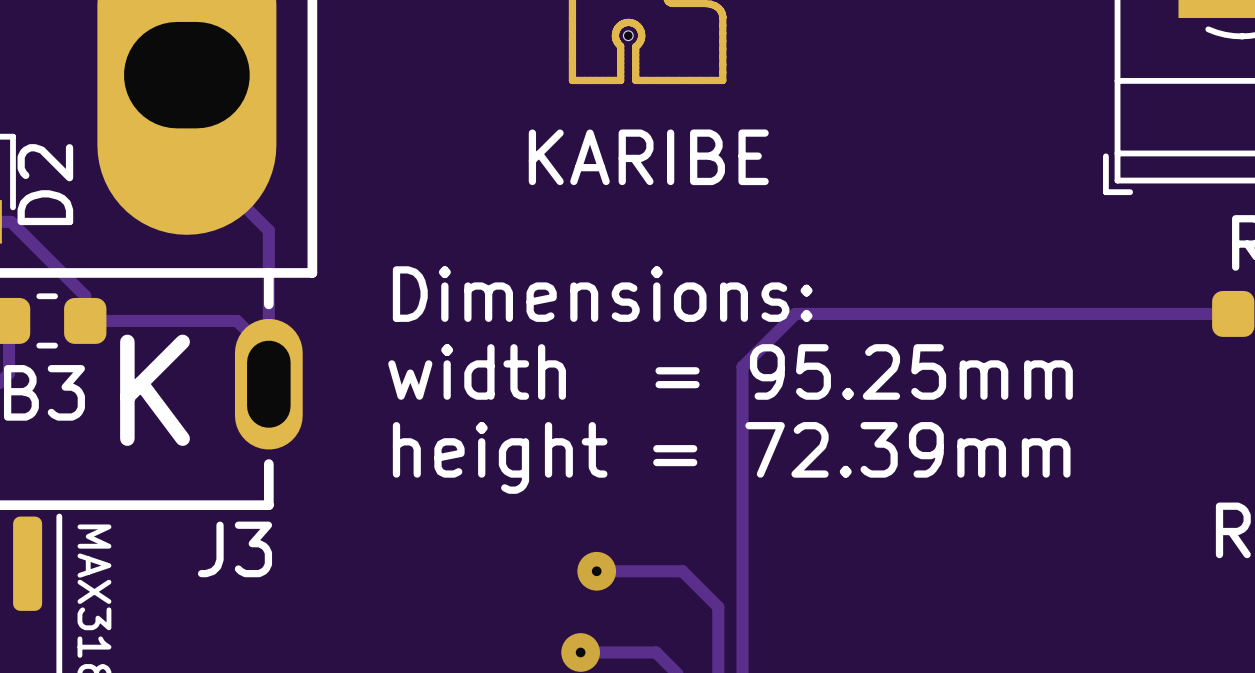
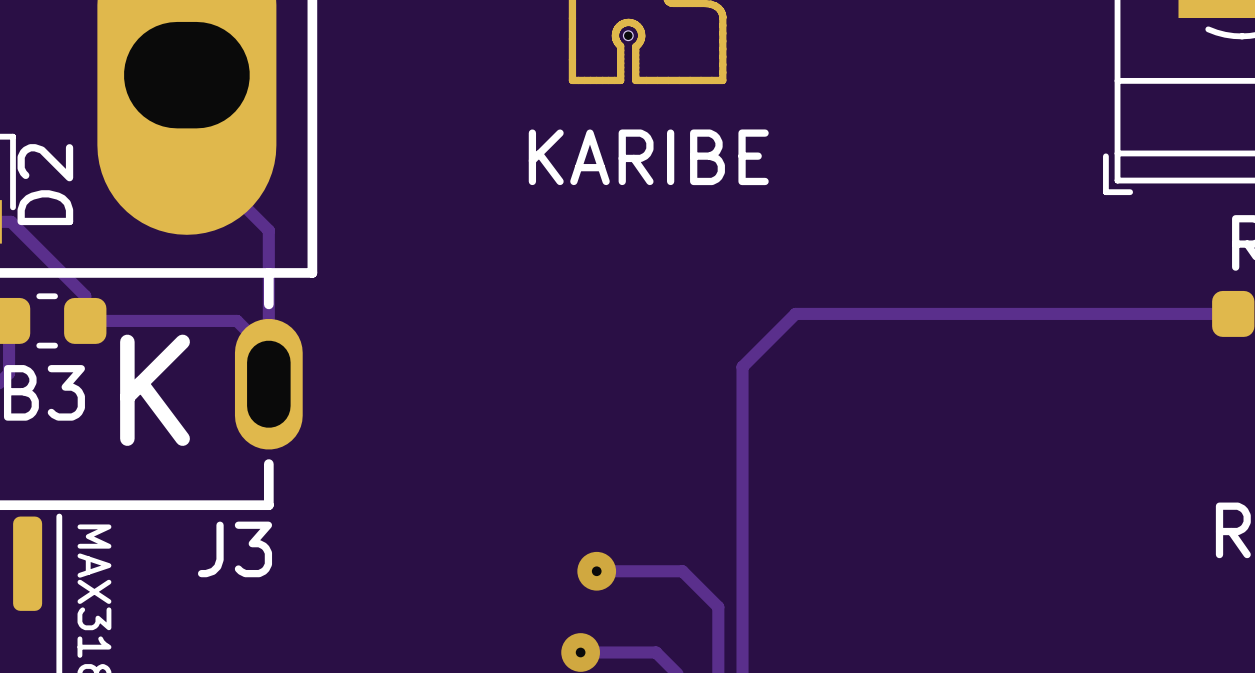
text: Dimensions: (602, 294) -> none
text: width = 95.25mm (730, 371) -> none
text: height = 72.39mm (731, 457) -> none

